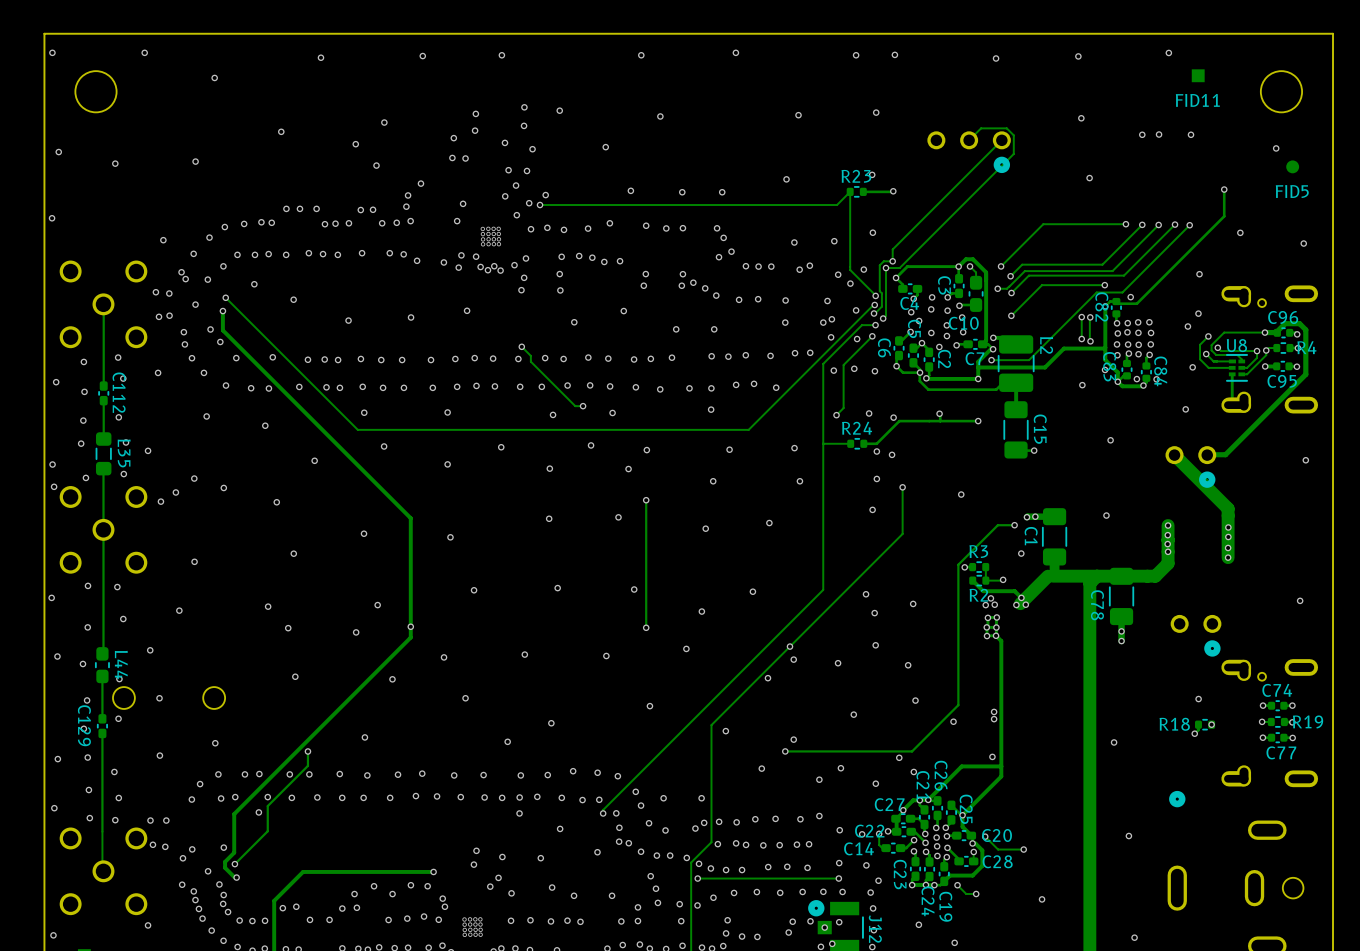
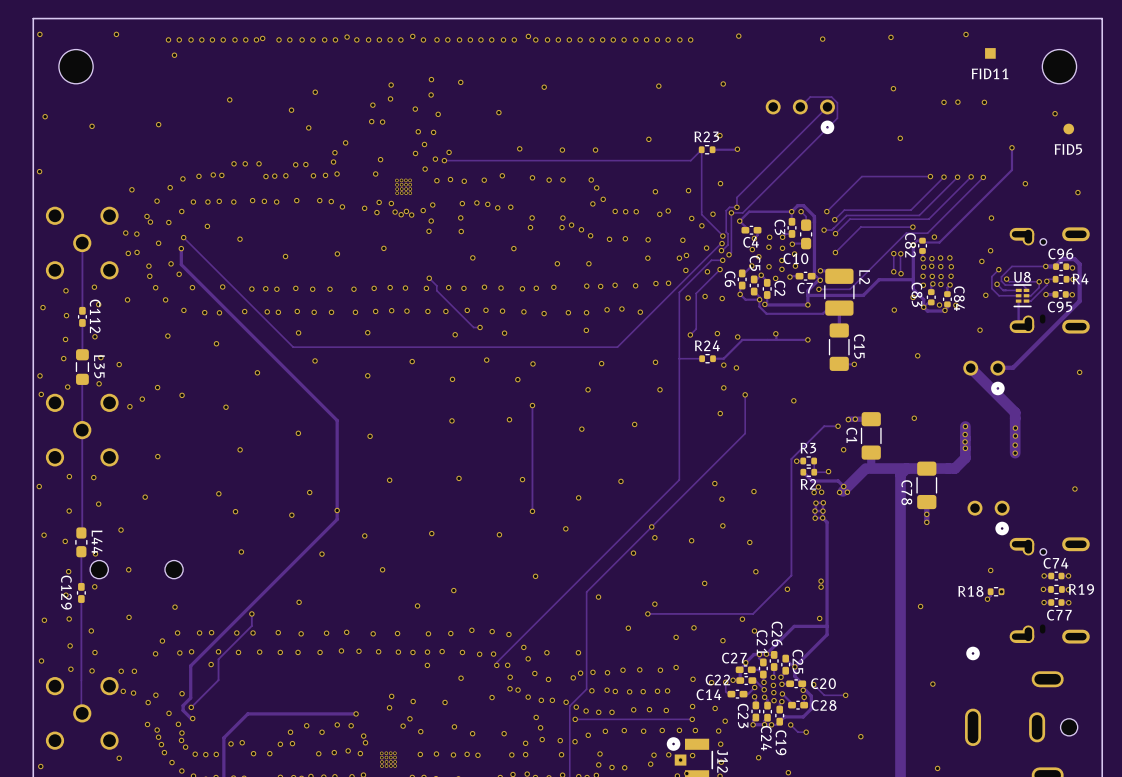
via: (735, 52) -> none
via: (856, 55) -> none
via: none -> (168, 39)
via: none -> (179, 39)
via: none -> (191, 39)
via: none -> (201, 39)
via: none -> (212, 39)
via: none -> (223, 39)
via: none -> (234, 39)
via: none -> (245, 39)
via: none -> (256, 39)
via: none -> (279, 39)
via: none -> (289, 39)
via: none -> (302, 39)
via: none -> (312, 39)
via: none -> (324, 39)
via: none -> (335, 39)
via: none -> (356, 39)
via: none -> (368, 39)
via: none -> (379, 39)
via: none -> (390, 39)
via: none -> (400, 39)
via: none -> (423, 39)
via: none -> (437, 39)
via: none -> (447, 39)
via: none -> (459, 39)
via: none -> (470, 39)
via: none -> (480, 39)
via: none -> (491, 39)
via: none -> (503, 39)
via: none -> (514, 39)
via: none -> (535, 39)
via: none -> (547, 39)
via: none -> (558, 39)
via: none -> (569, 39)
via: none -> (580, 39)
via: none -> (591, 39)
via: none -> (602, 39)
via: none -> (613, 39)
via: none -> (624, 39)
via: none -> (635, 39)
via: none -> (646, 39)
via: none -> (657, 39)
via: none -> (668, 39)
via: none -> (679, 39)
via: none -> (690, 39)

